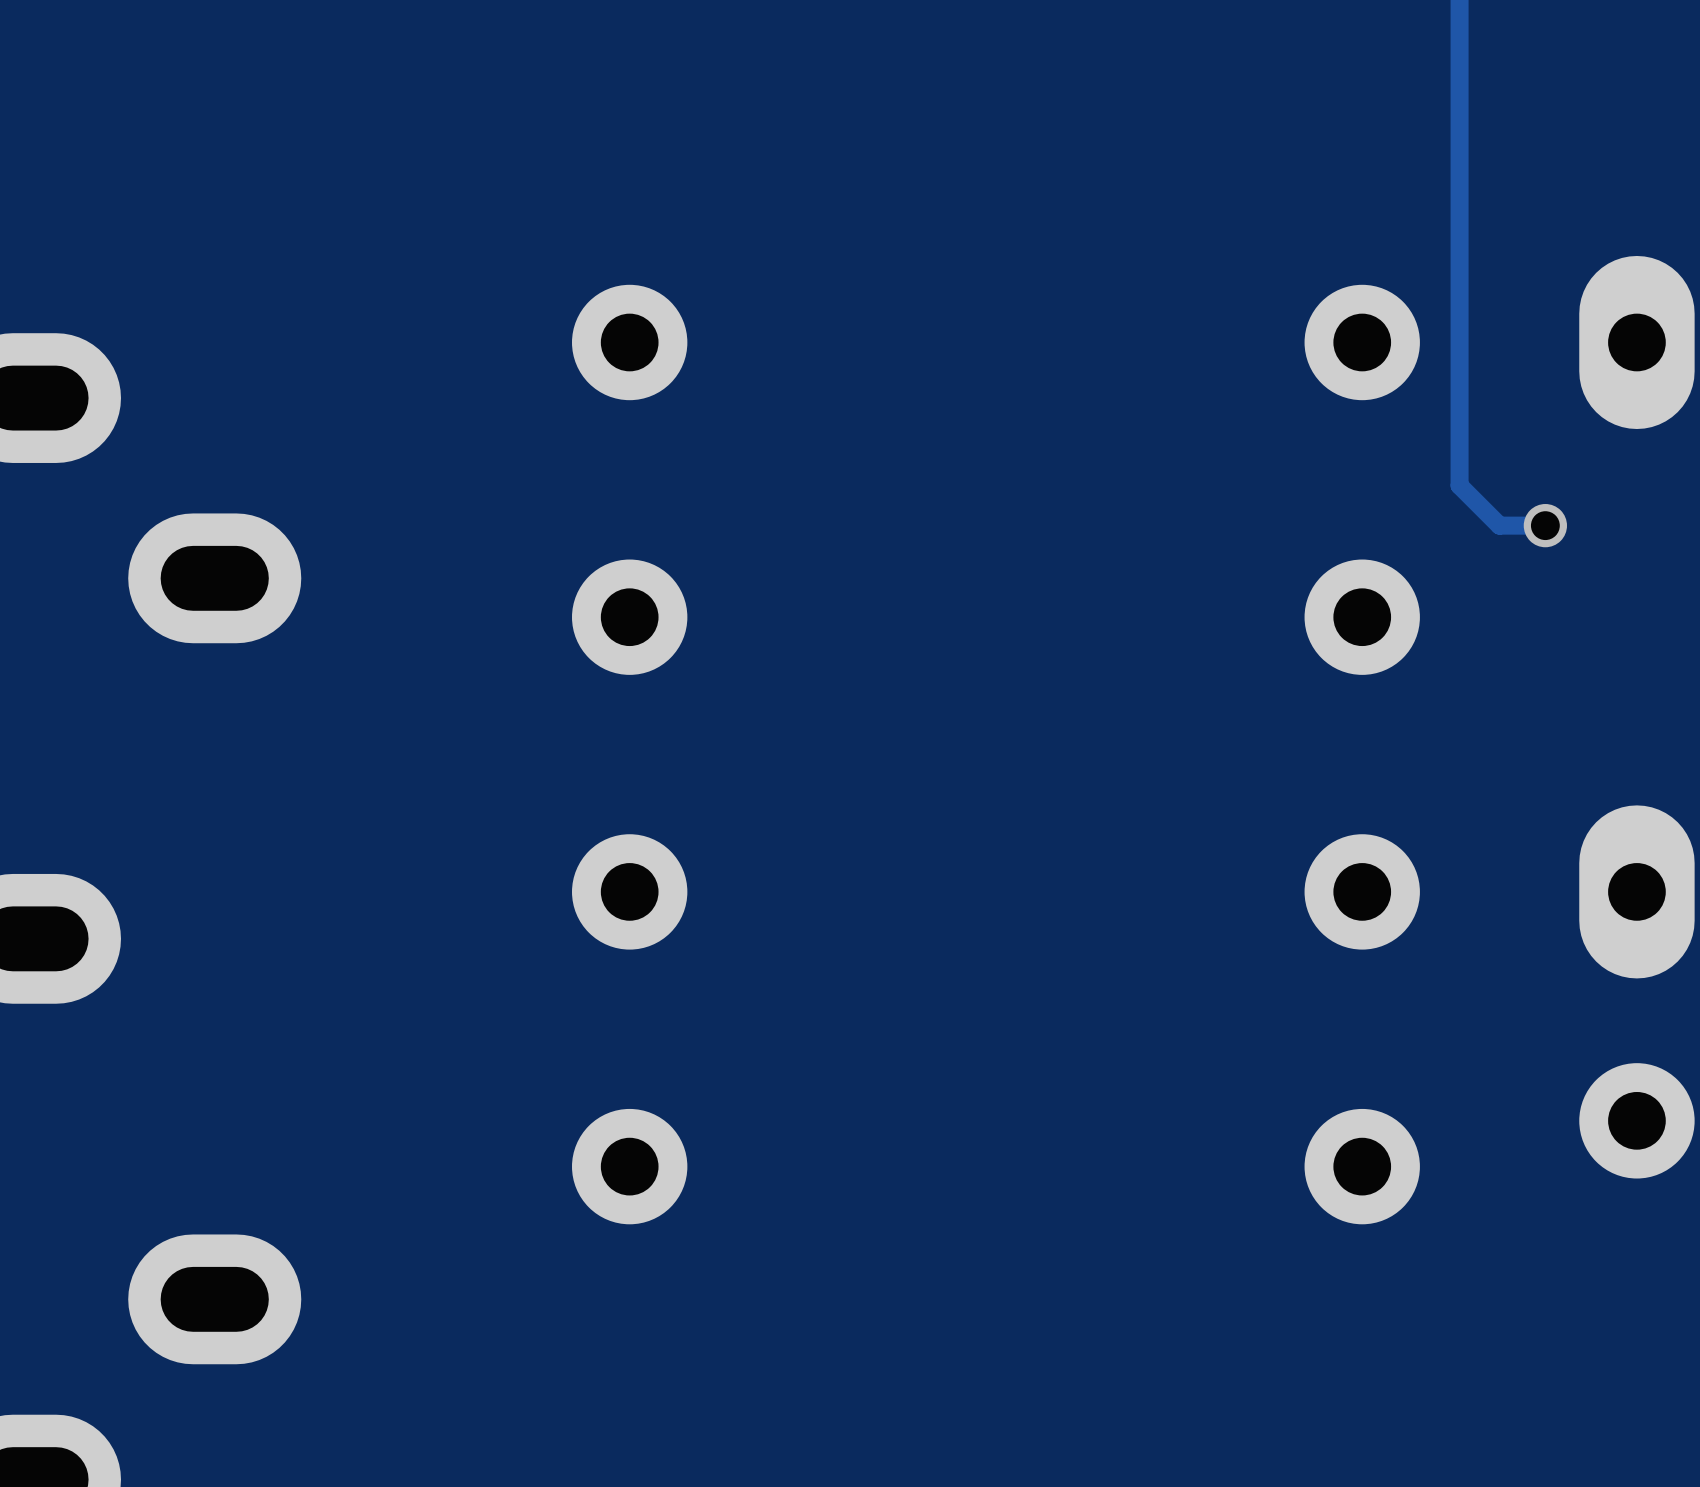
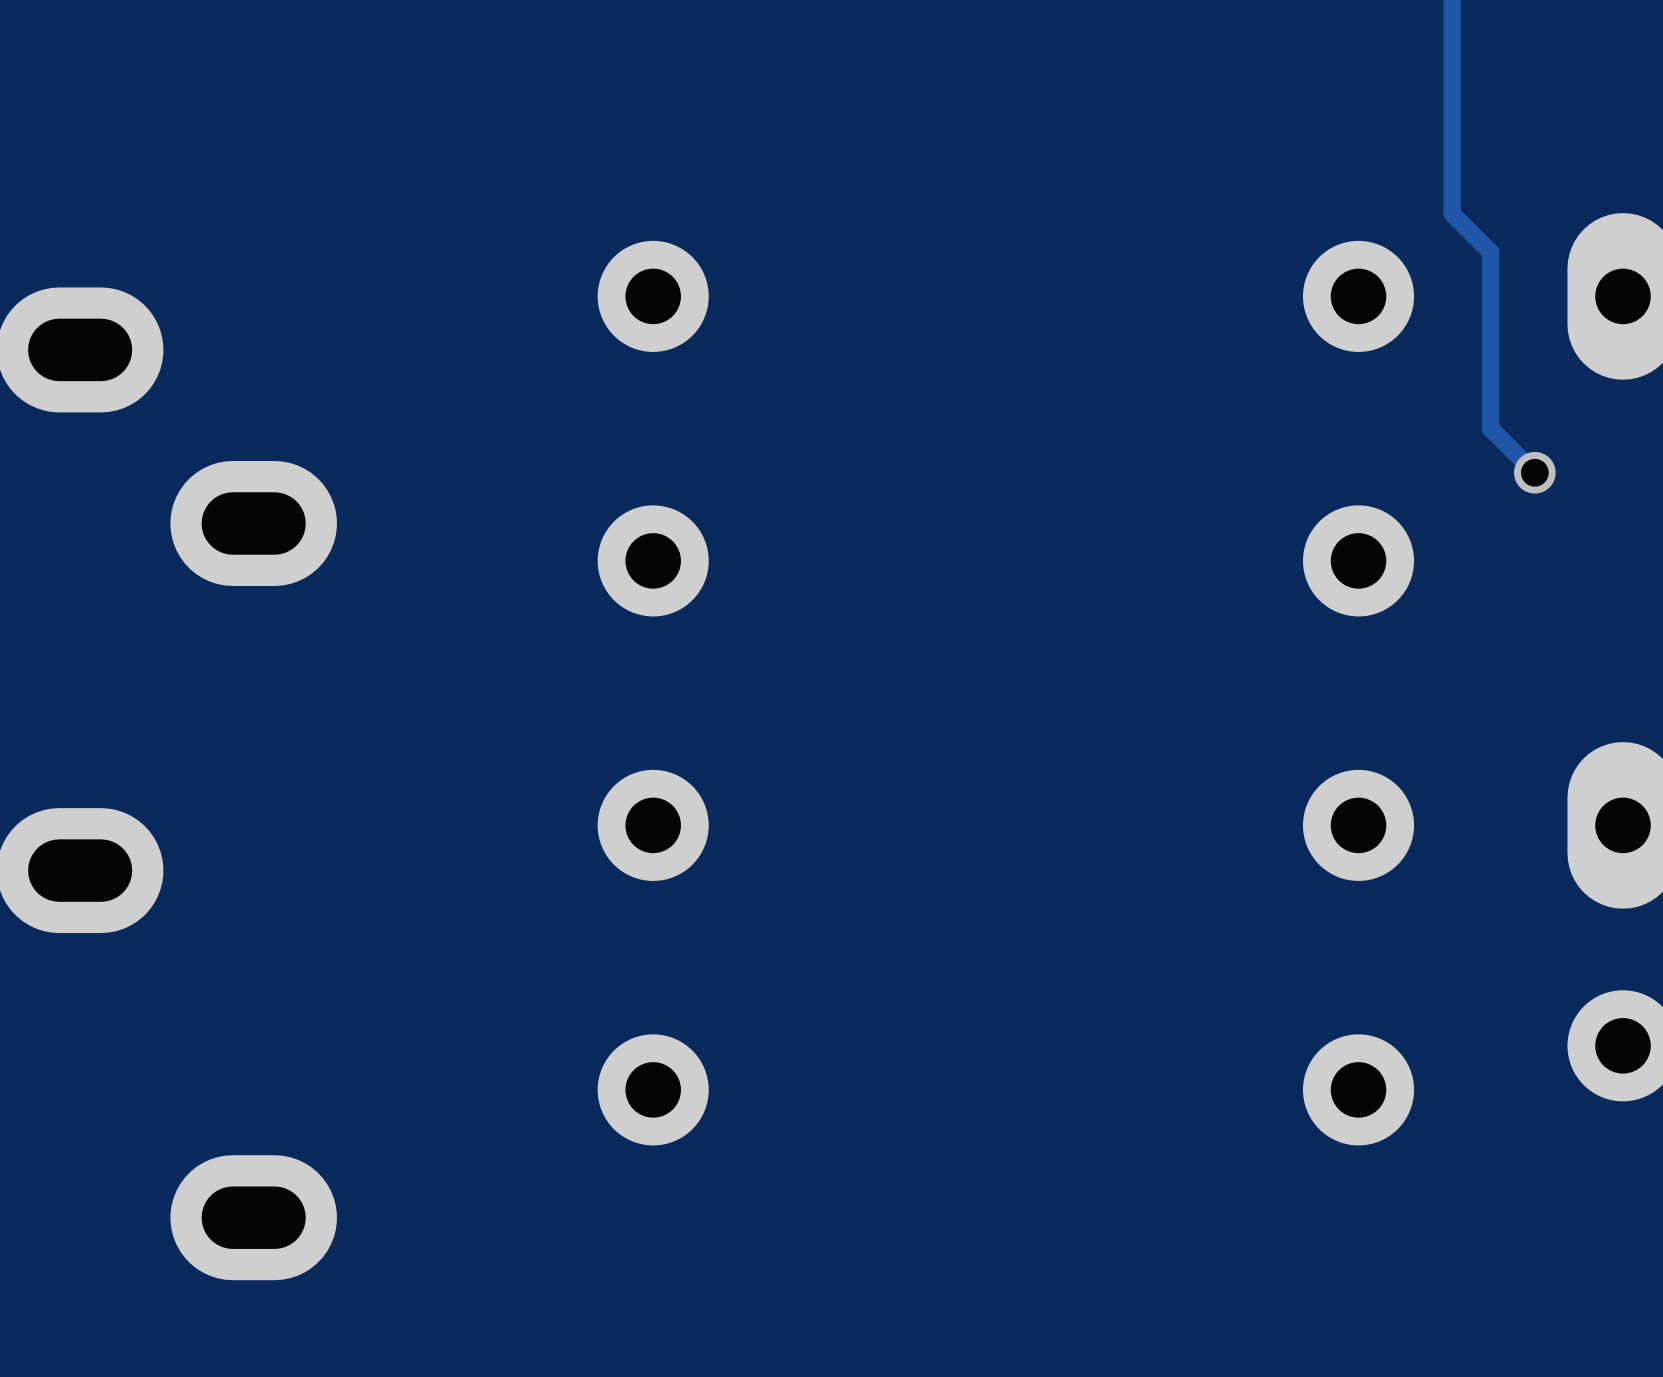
track: (1459, 256) (1459, 485) (1499, 525) (1545, 525) -> (1452, 213) (1490, 252) (1490, 428) (1534, 472)

